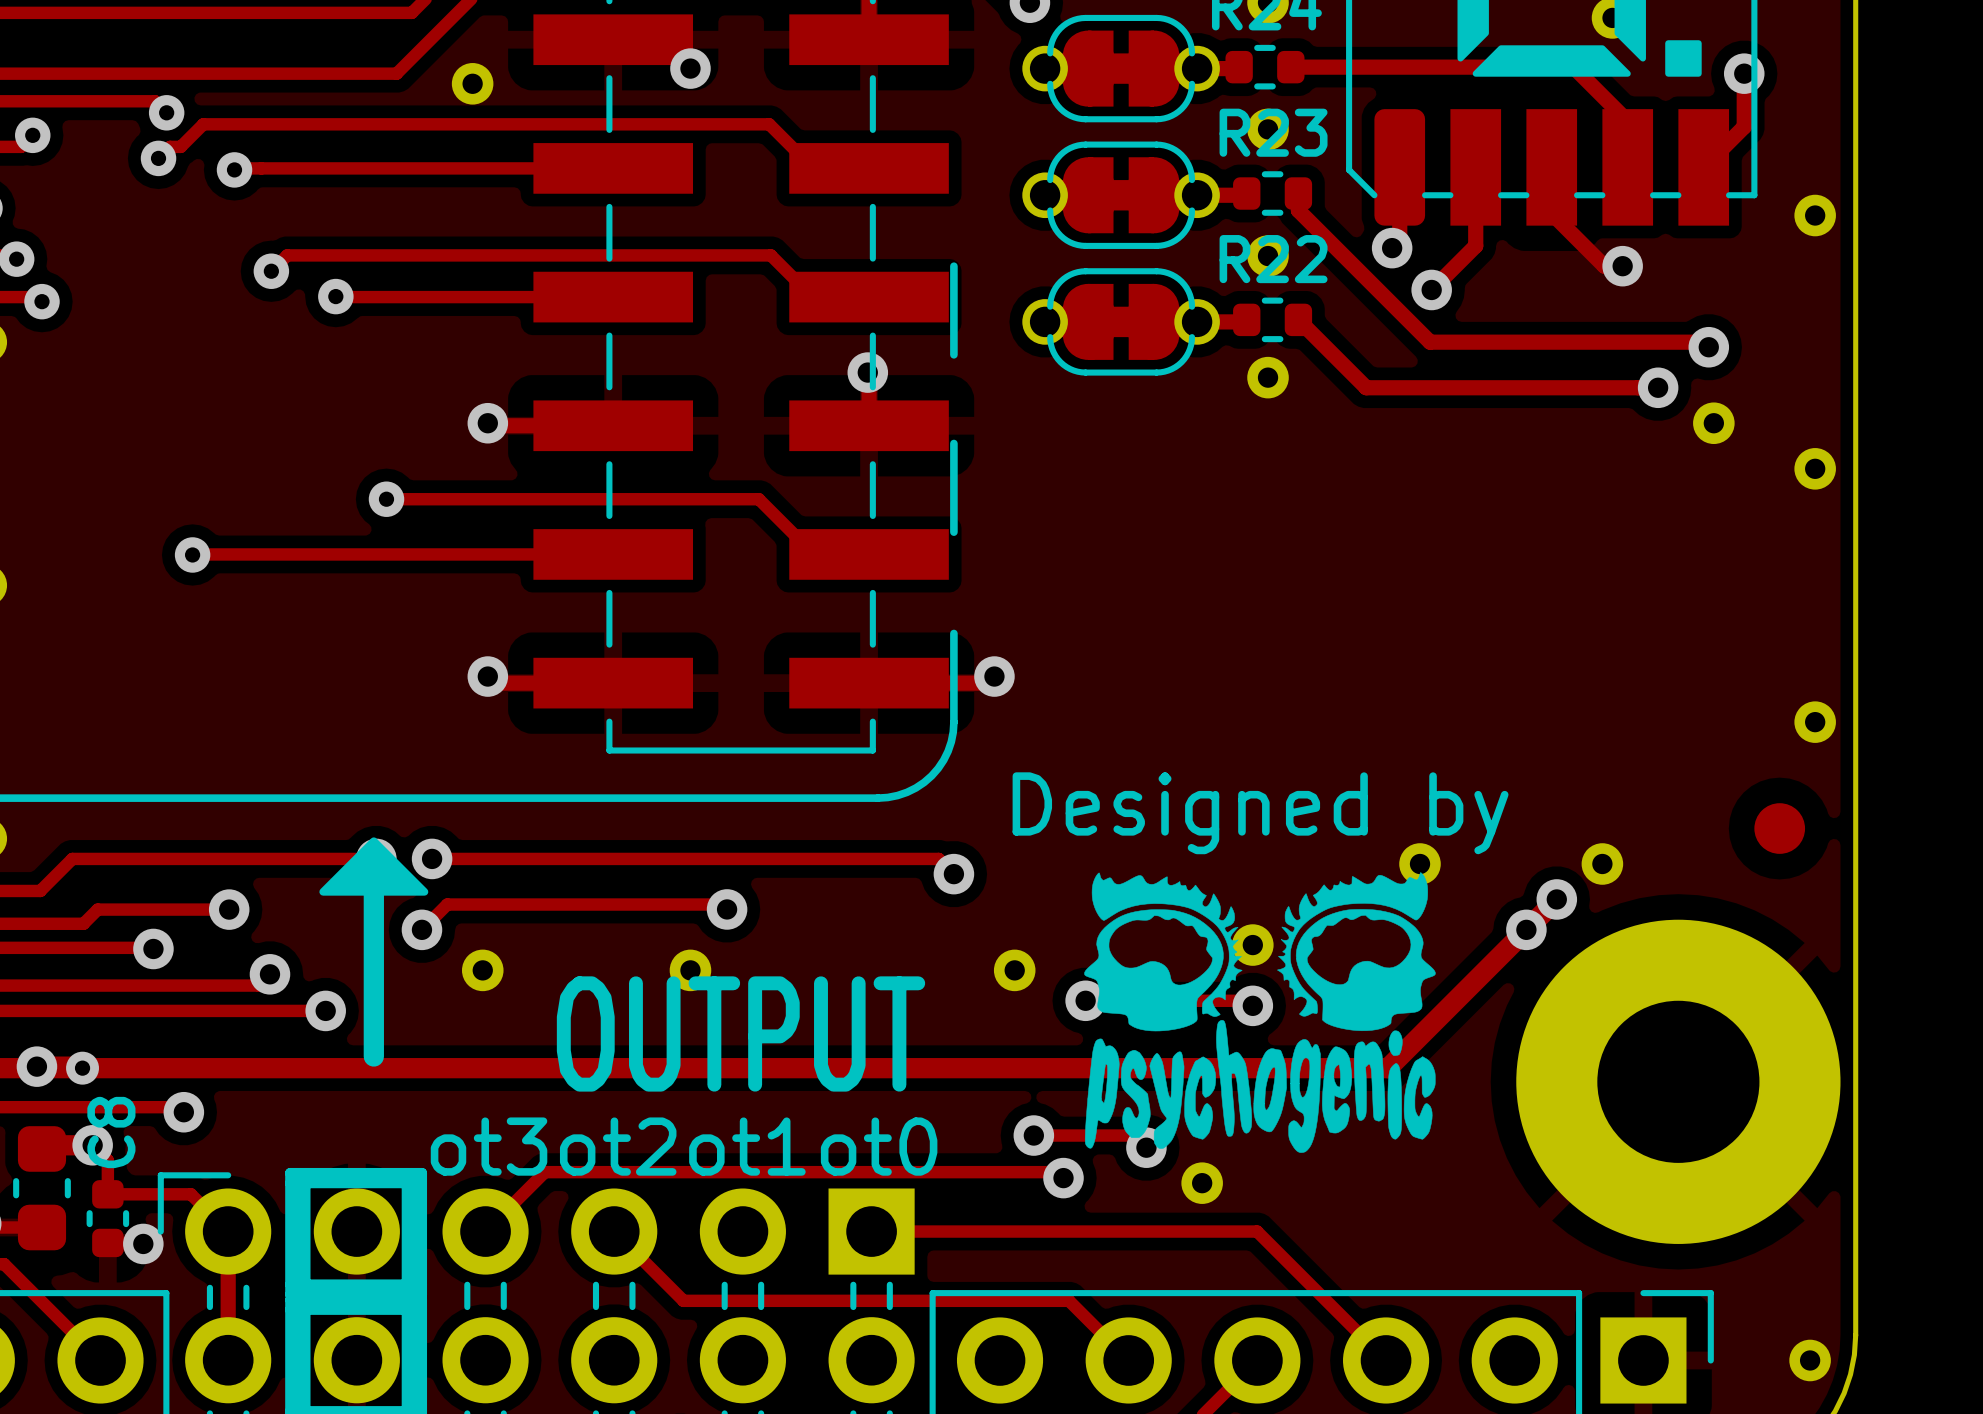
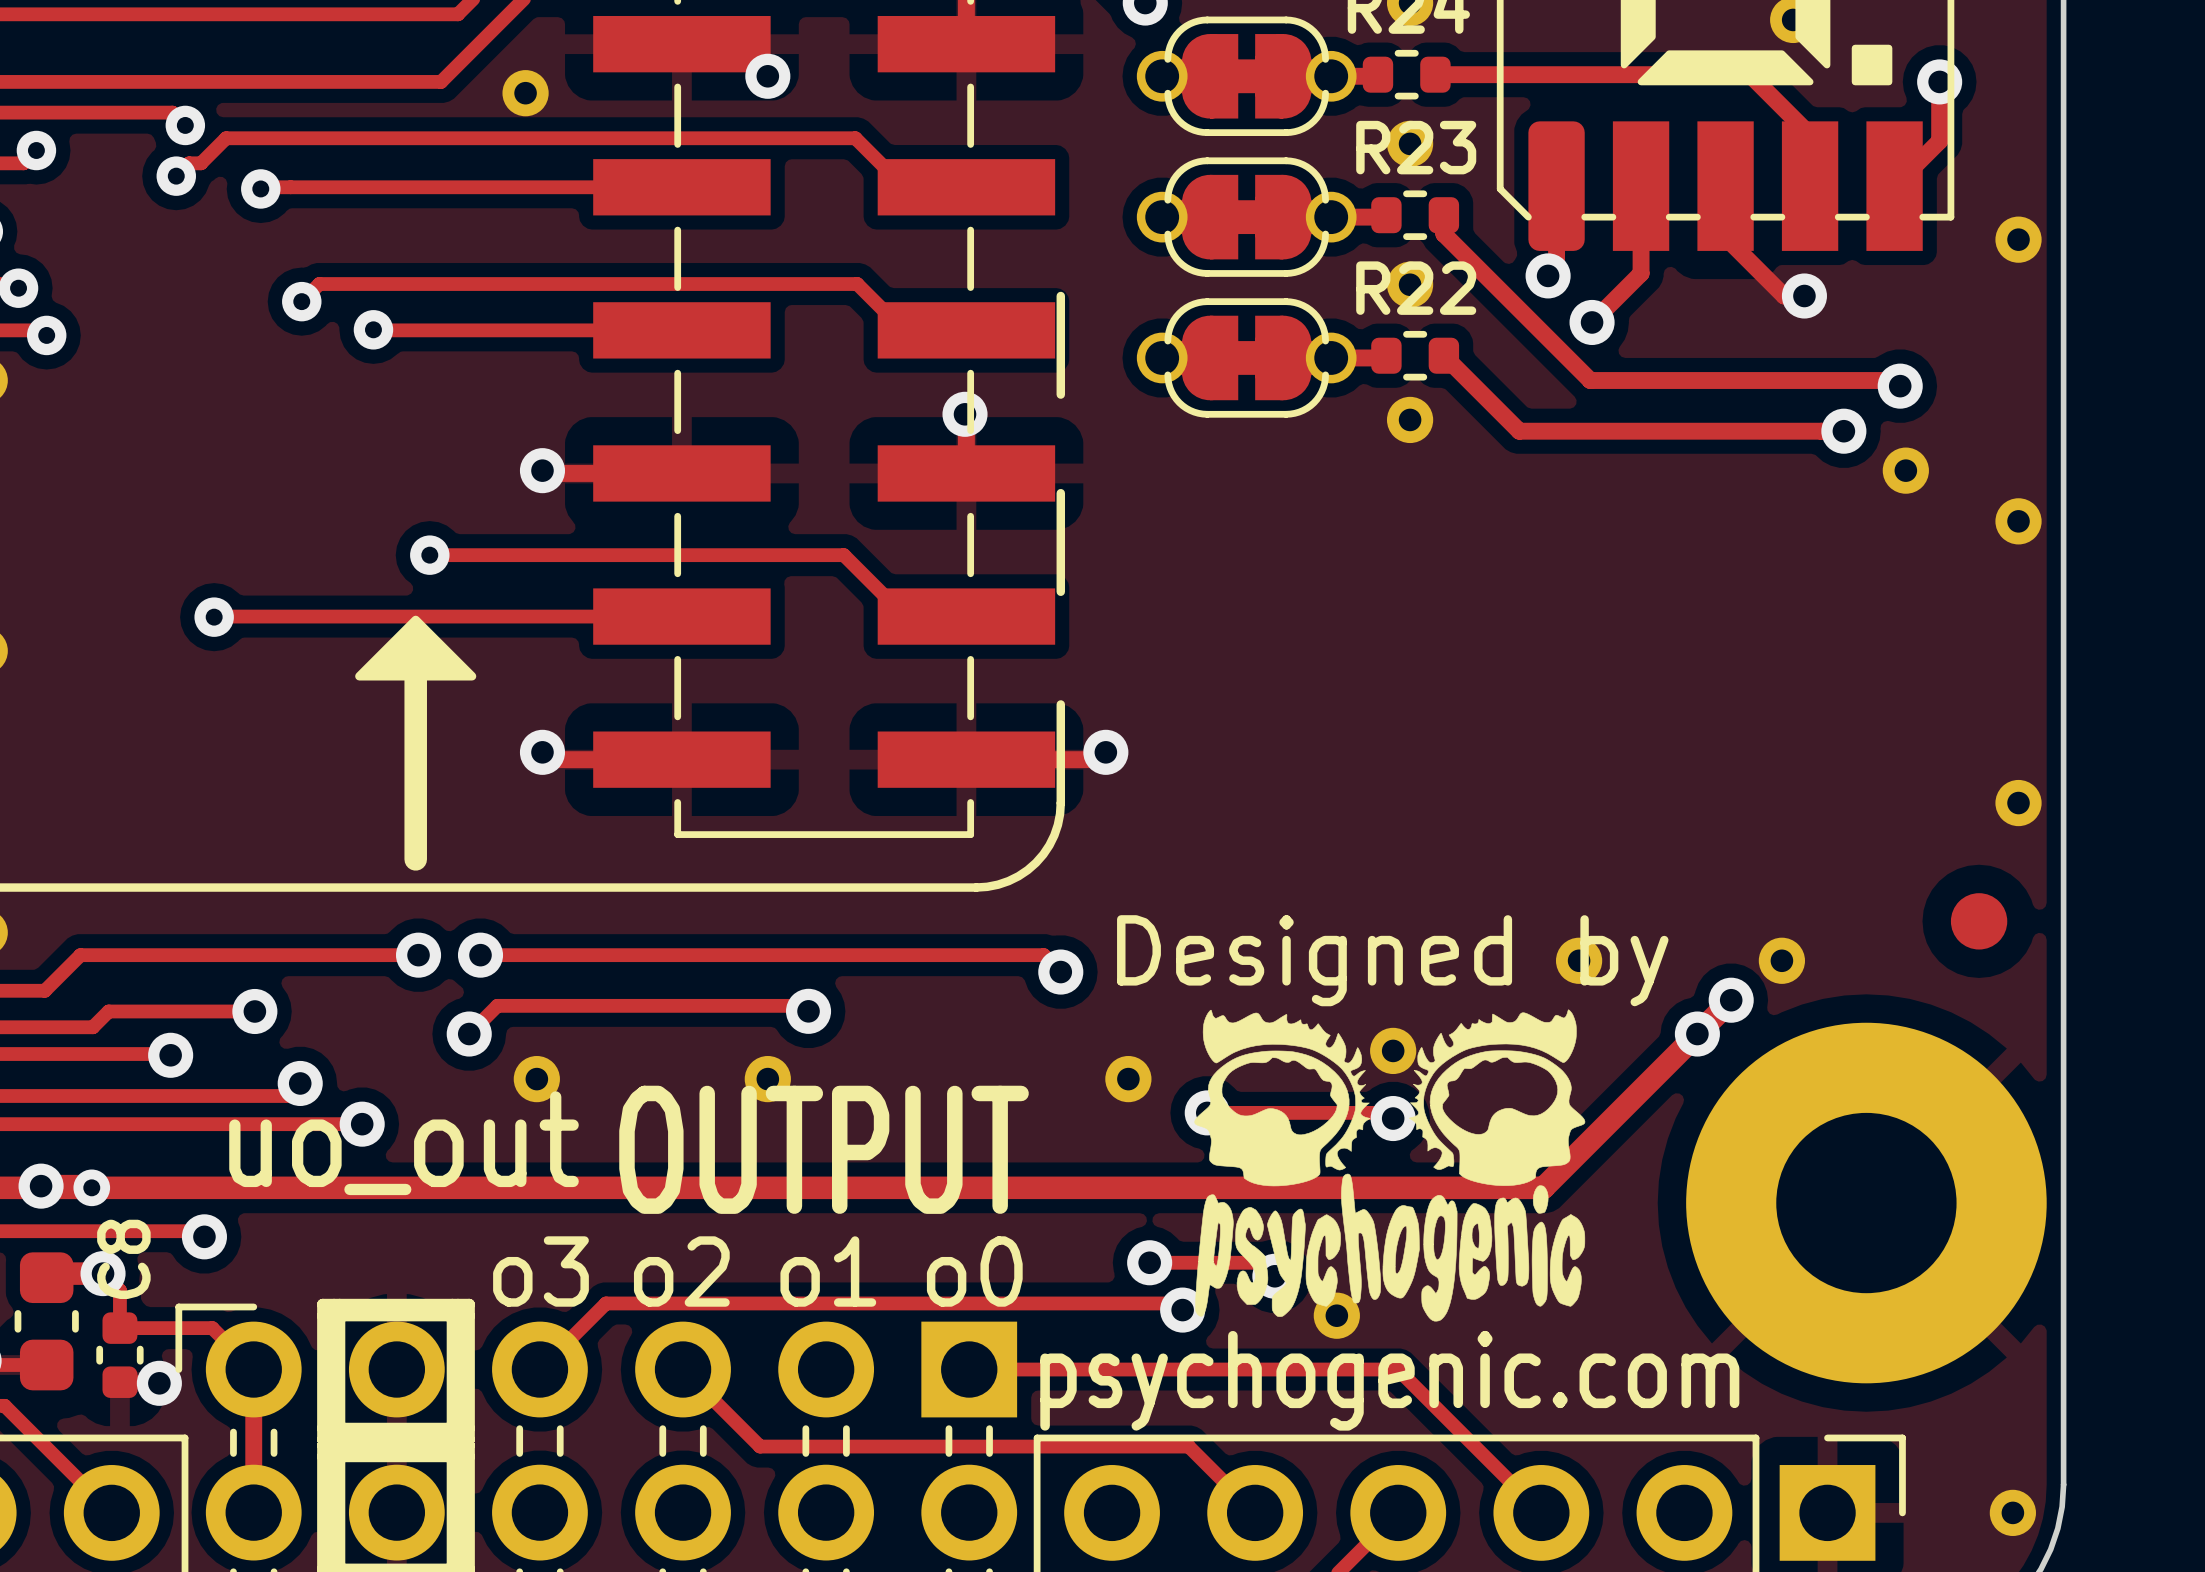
text position: Designed by (1260, 813) -> Designed by (1392, 960)
drawing position: (373, 866) -> (415, 648)
line: (373, 879) (373, 1056) -> (415, 662) (415, 859)
drawing position: (1259, 1012) -> (1389, 1165)
text: none -> uo_out (404, 1143)
text: ot3 (489, 1146) -> o3 (540, 1271)
text: ot2 (618, 1146) -> o2 (681, 1271)
text: ot1 (747, 1146) -> o1 (828, 1271)
text: ot0 (879, 1146) -> o0 (974, 1271)
text: none -> psychogenic.com (1389, 1380)

